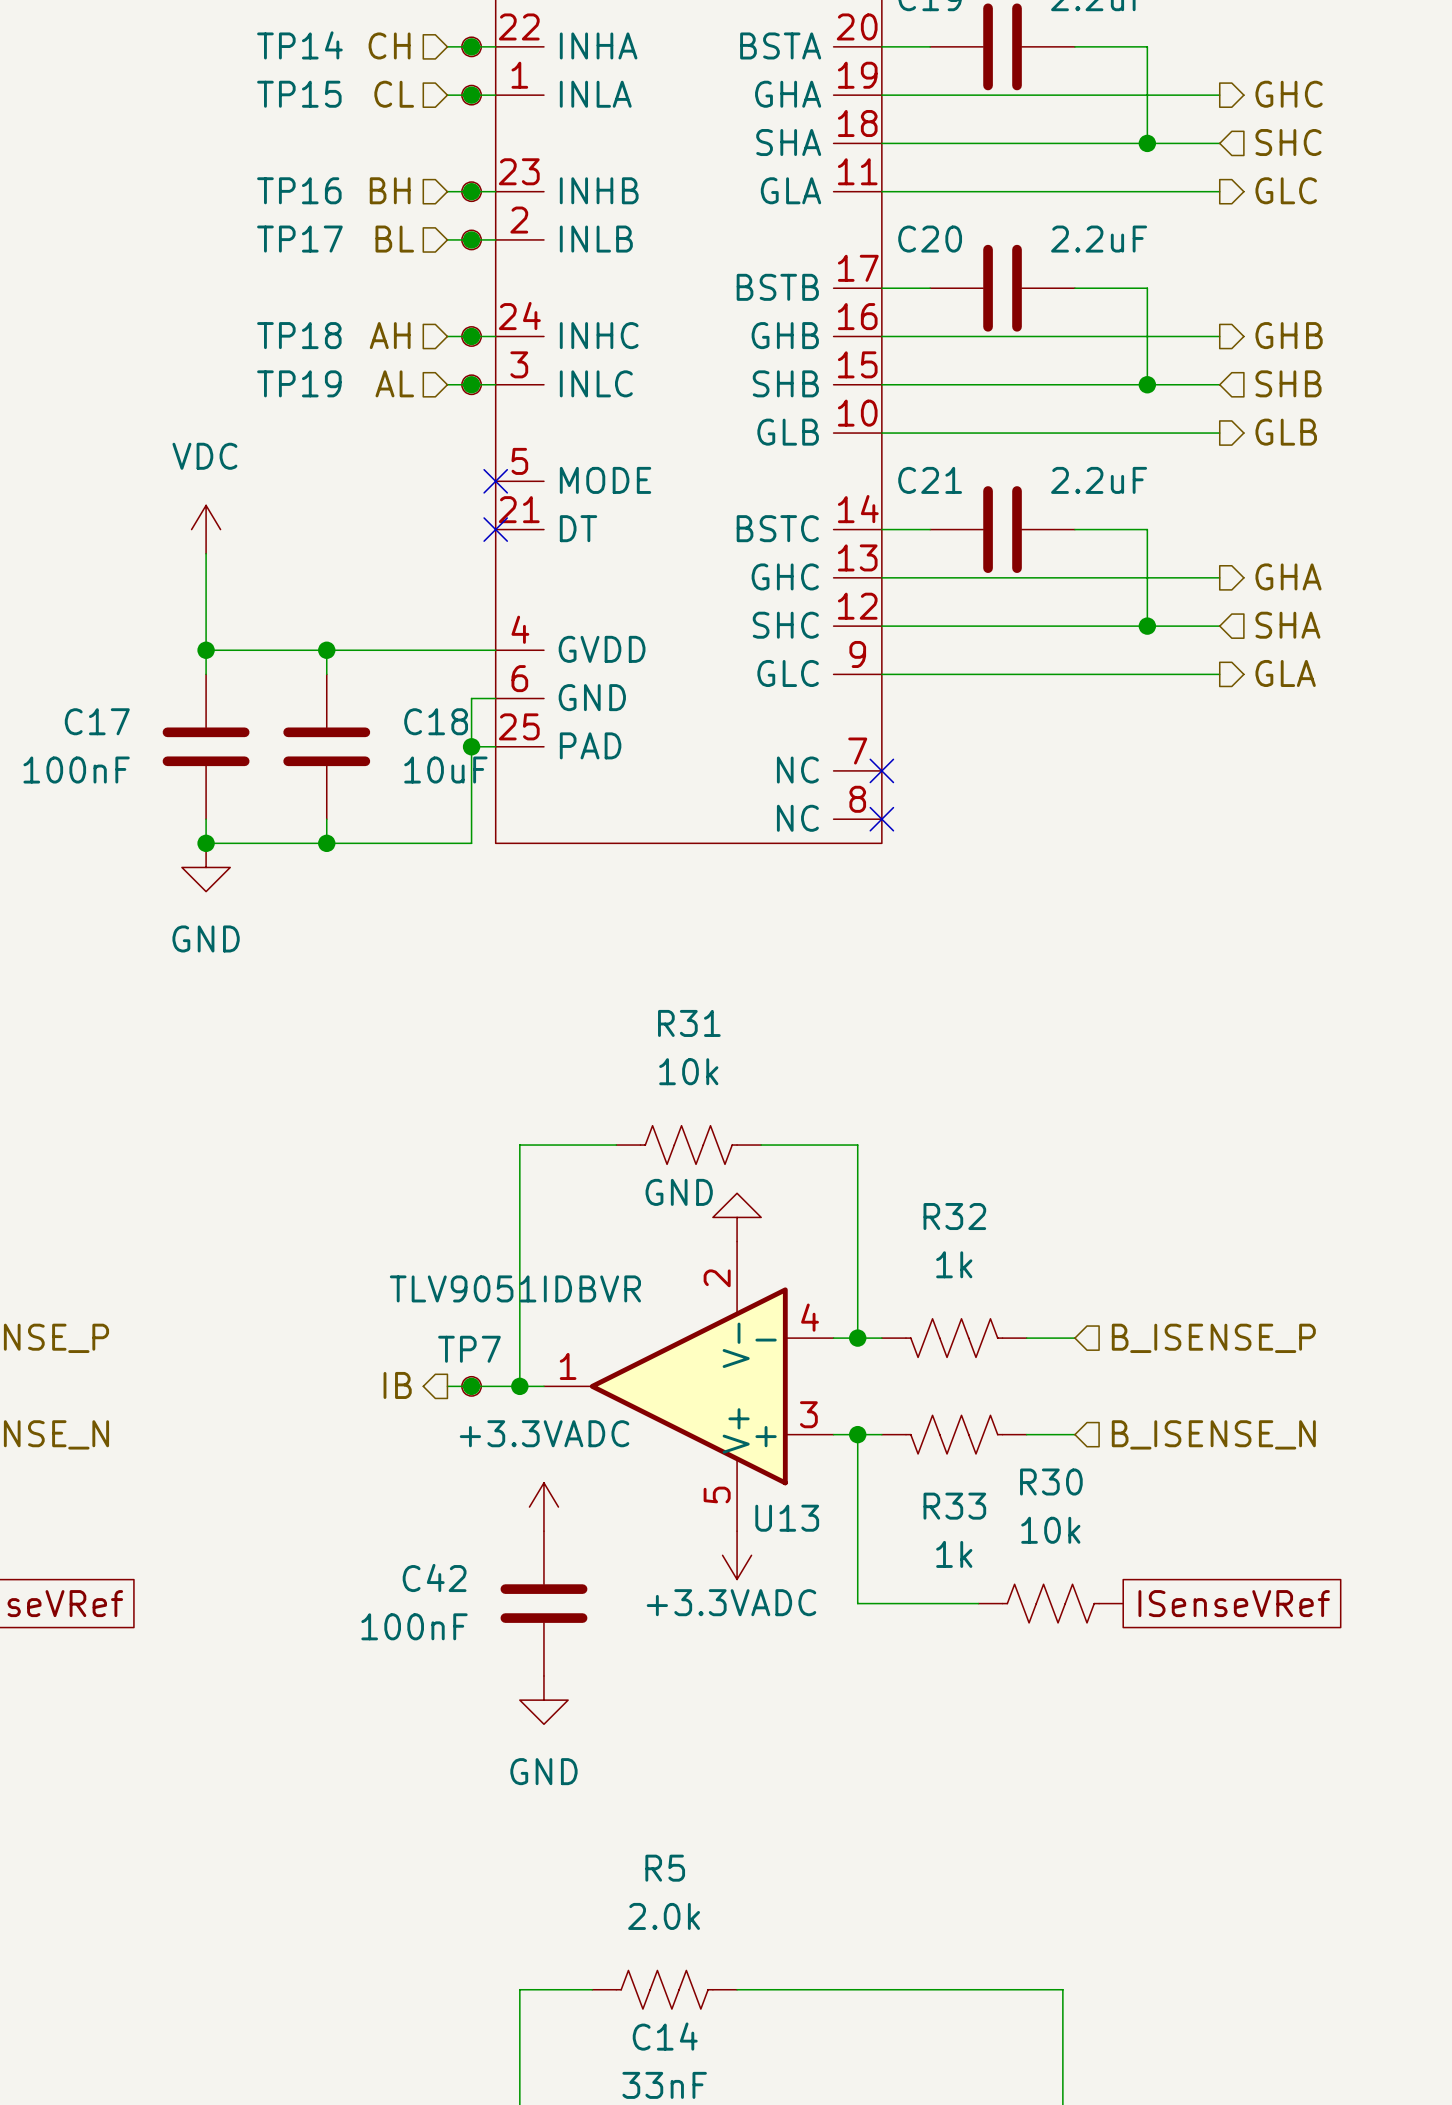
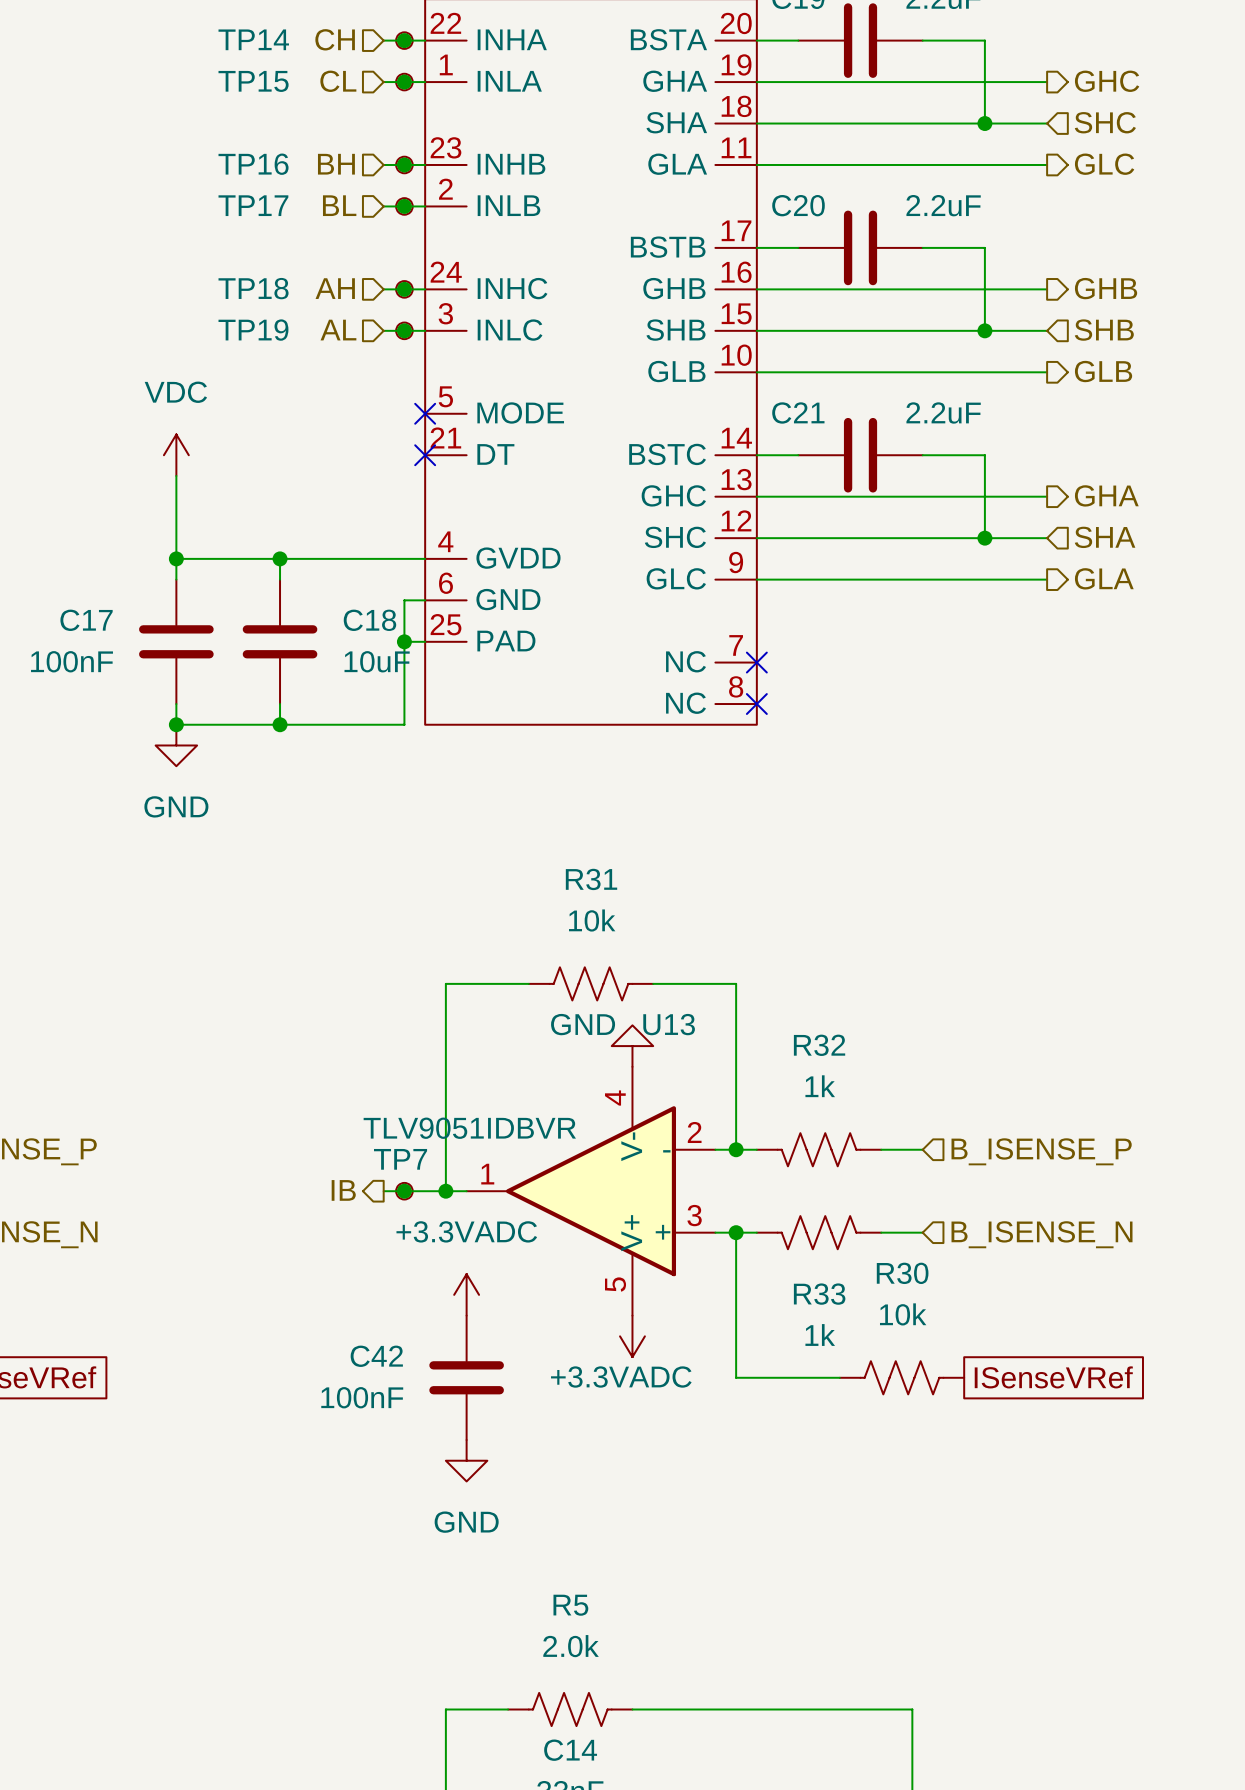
U13 pin number: 2 (717, 1278) -> 4 (615, 1098)
U13 value position: TLV9051IDBVR (515, 1288) -> TLV9051IDBVR (469, 1128)
U13 pin number: 4 (810, 1317) -> 2 (694, 1132)
U13 name position: U13 (787, 1518) -> U13 (669, 1024)

